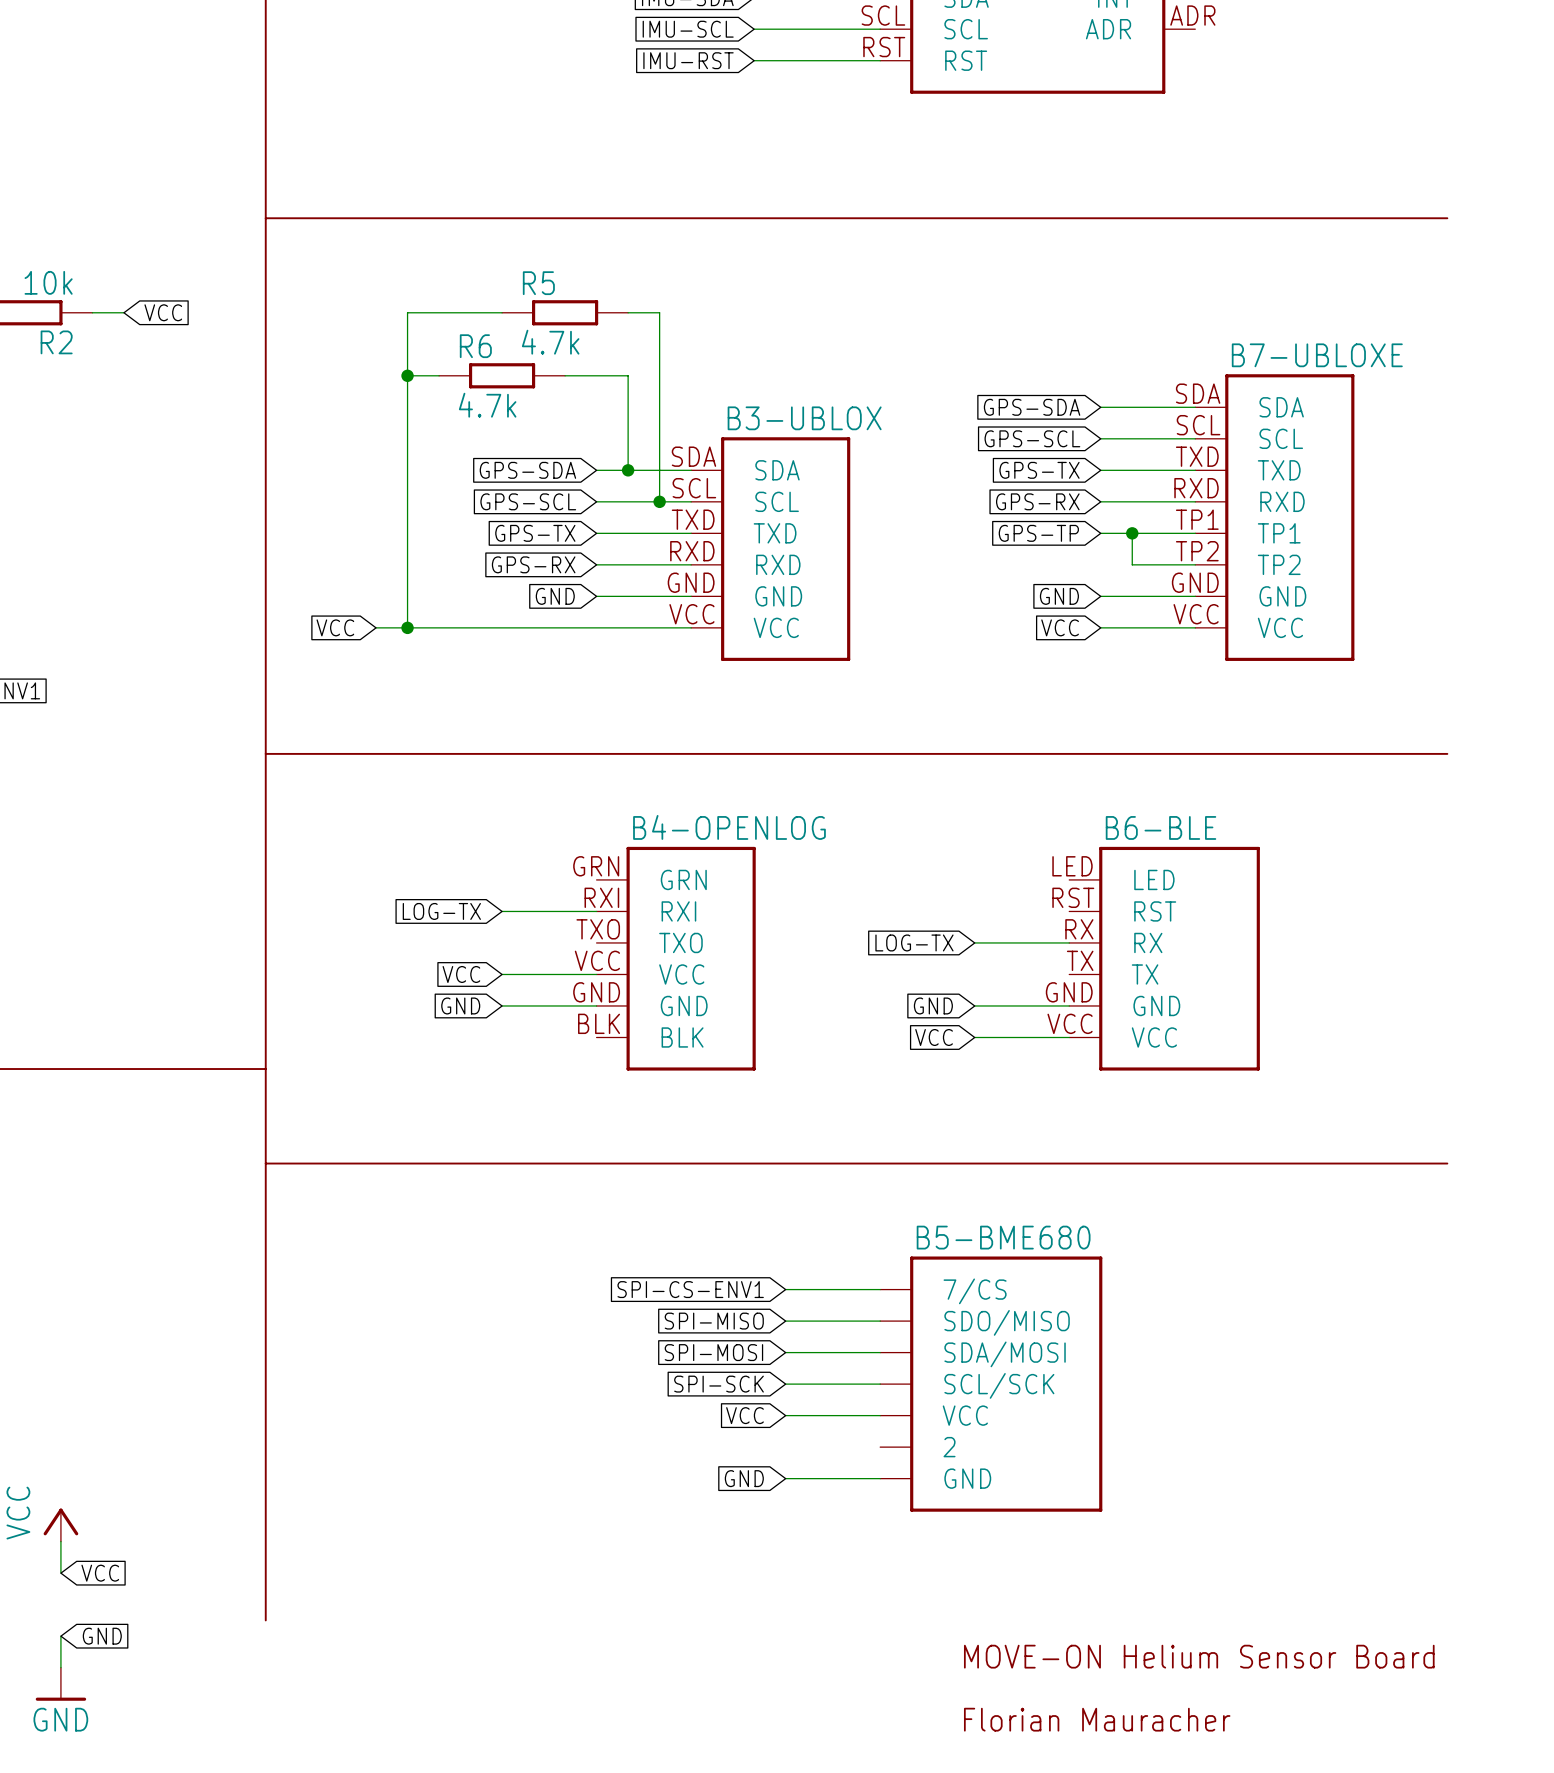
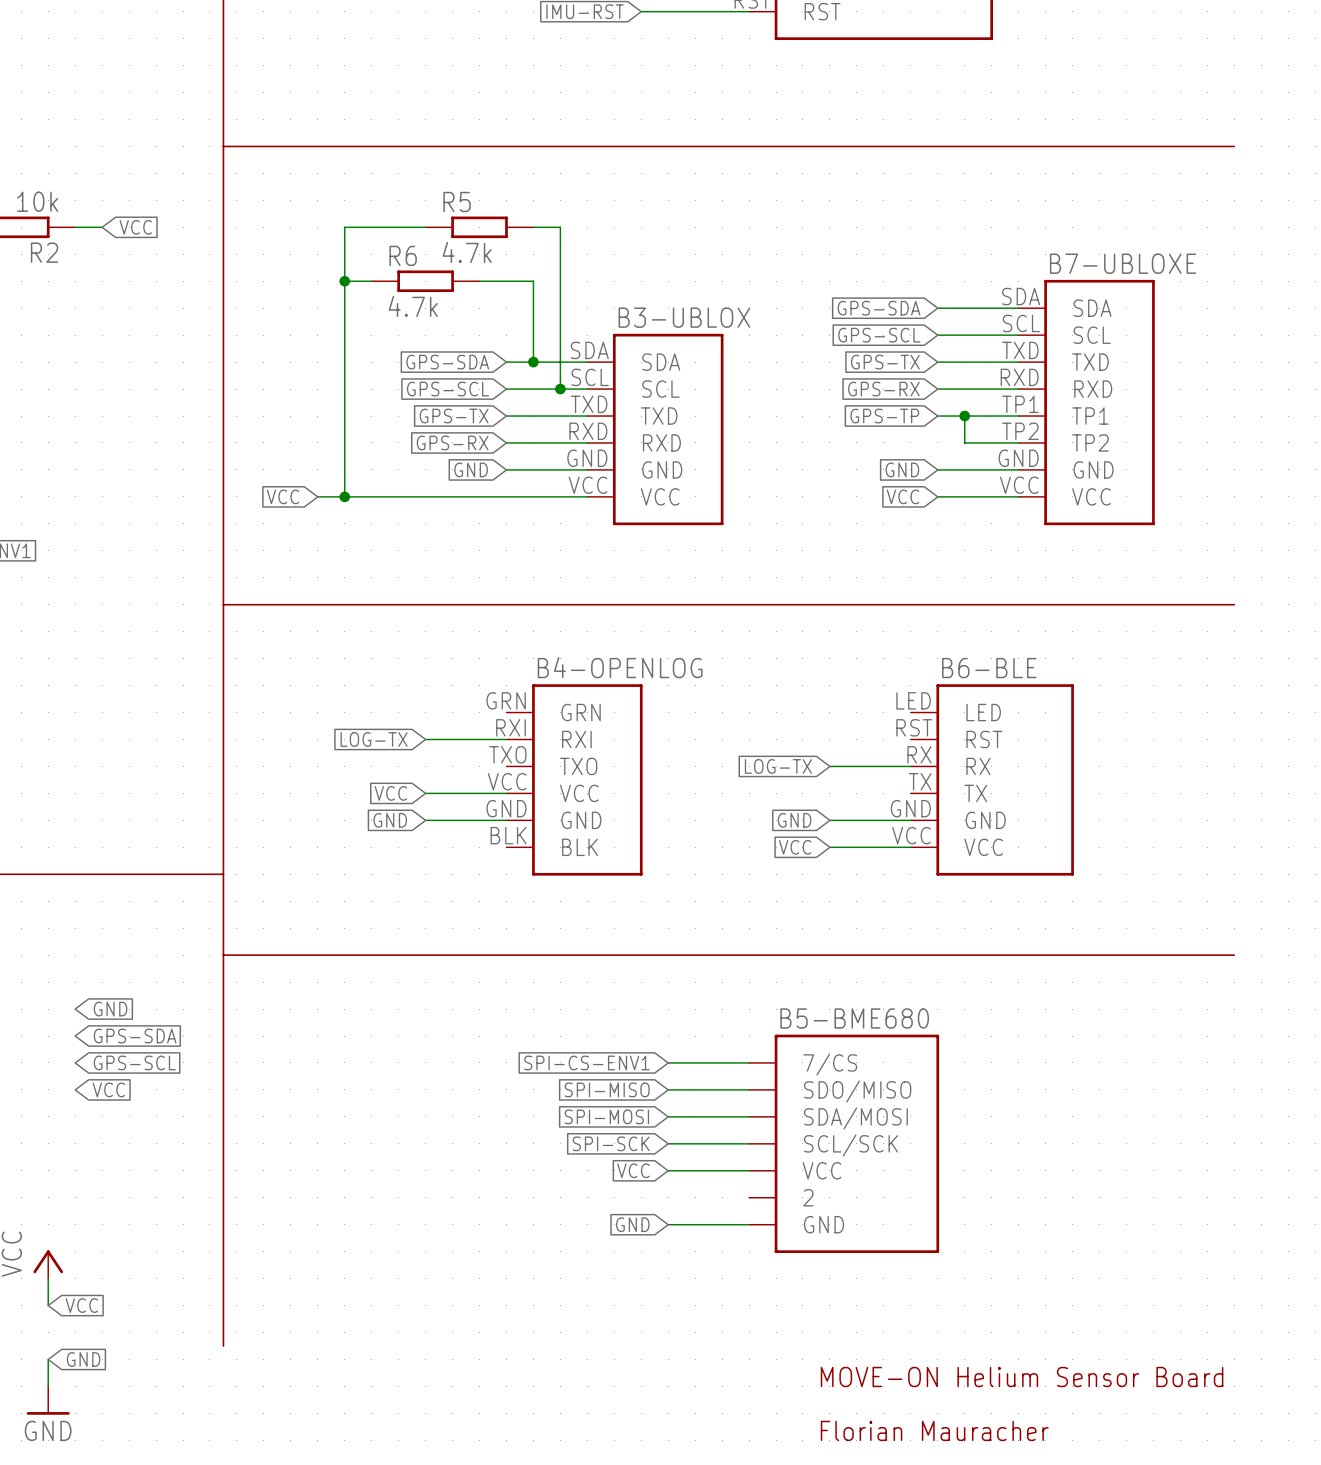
global label: none -> GND (110, 1009)
global label: none -> GPS-SDA (135, 1036)
global label: none -> GPS-SCL (134, 1062)
global label: none -> VCC (108, 1089)

